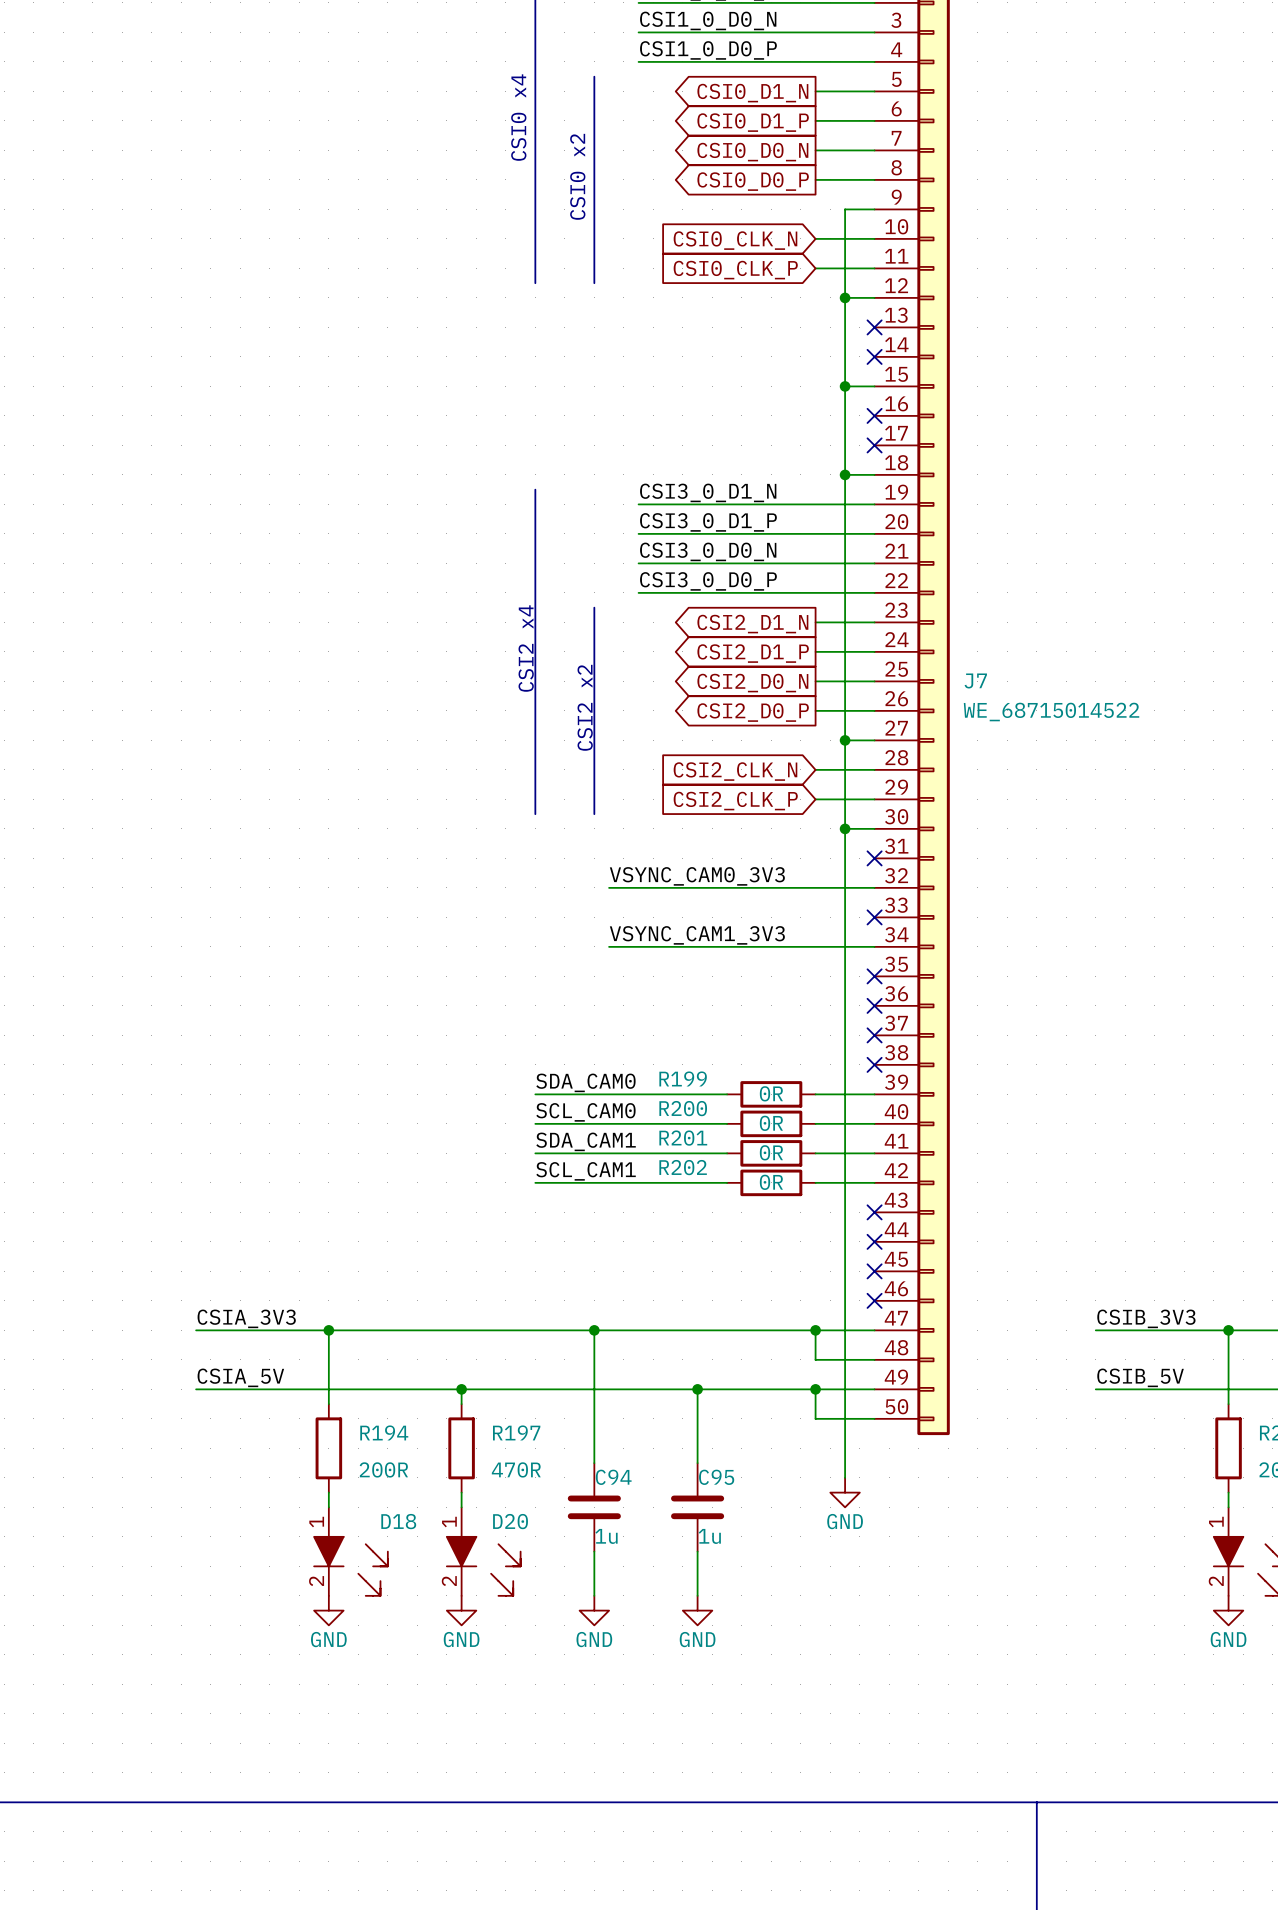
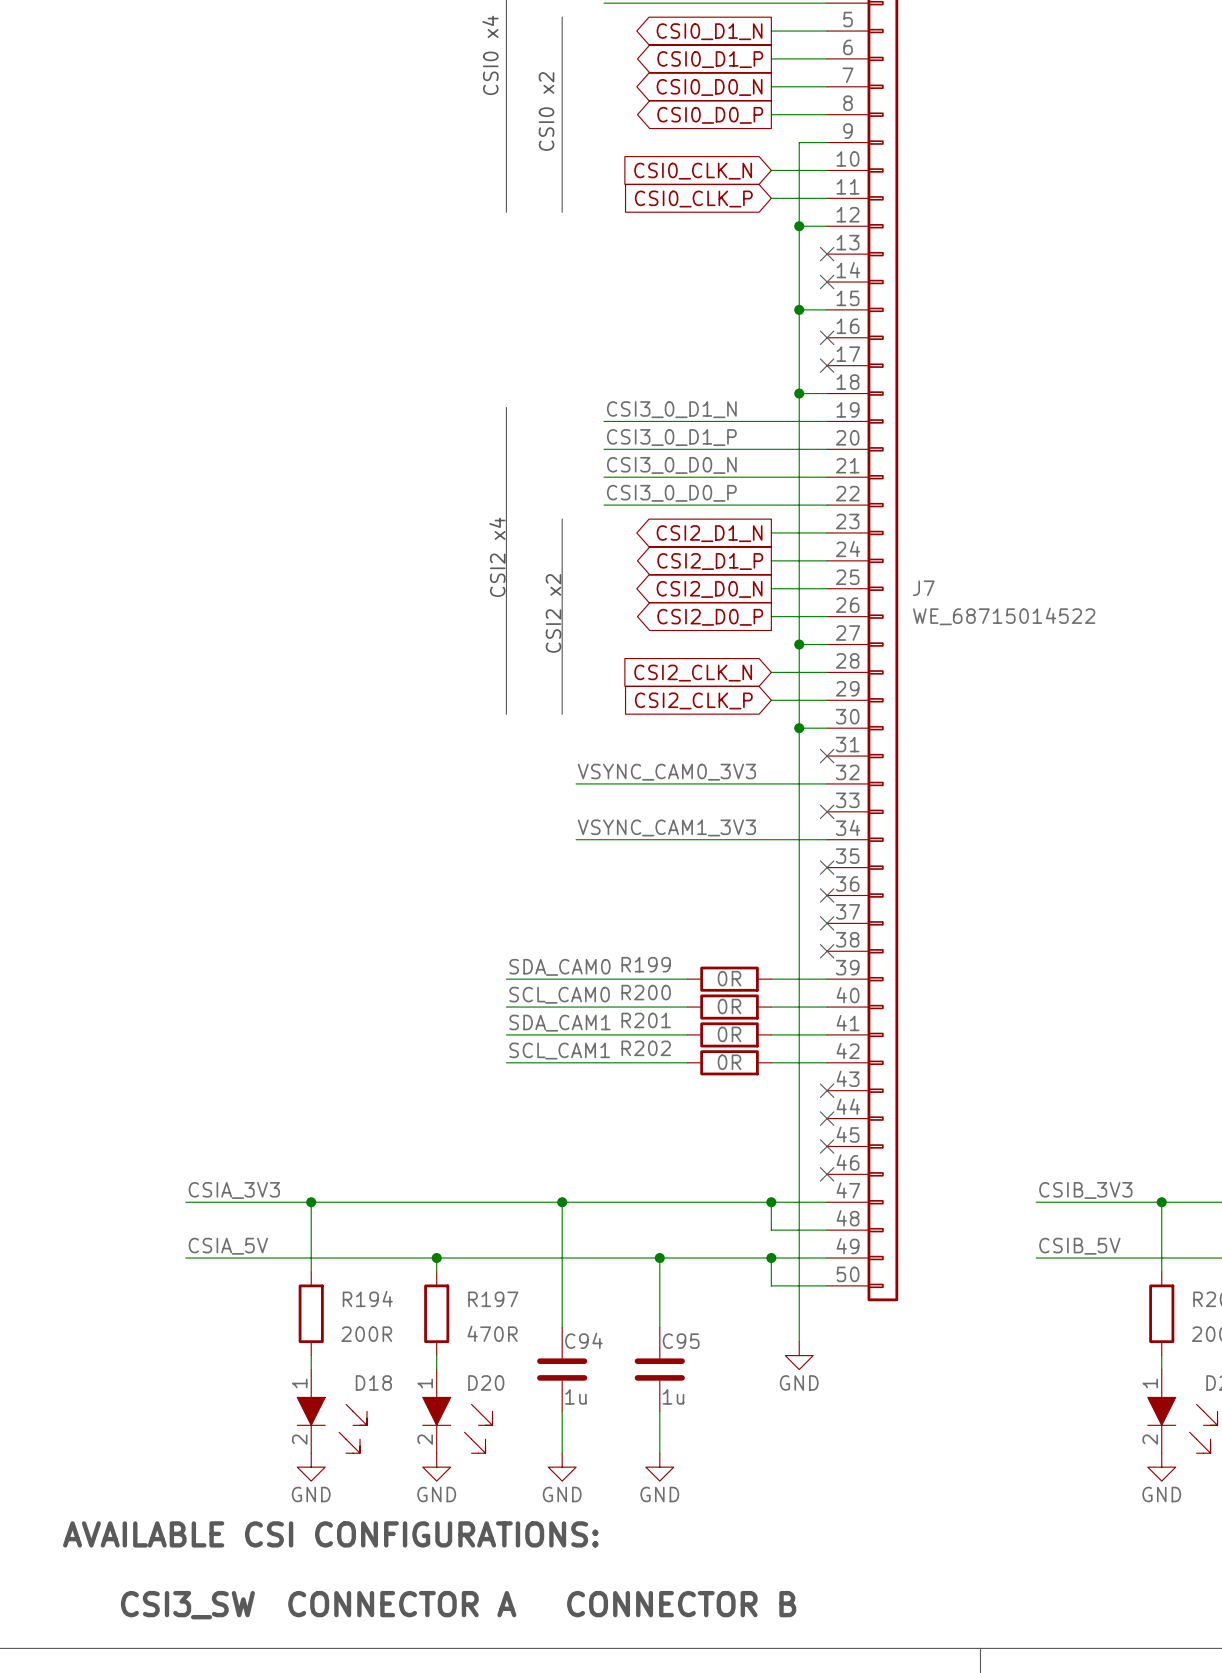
text: none -> AVAILABLE CSI CONFIGURATIONS: (330, 1534)
text: none -> CONNECTOR A (402, 1604)
text: none -> CONNECTOR B (681, 1604)
text: none -> CSI3_SW (187, 1605)

